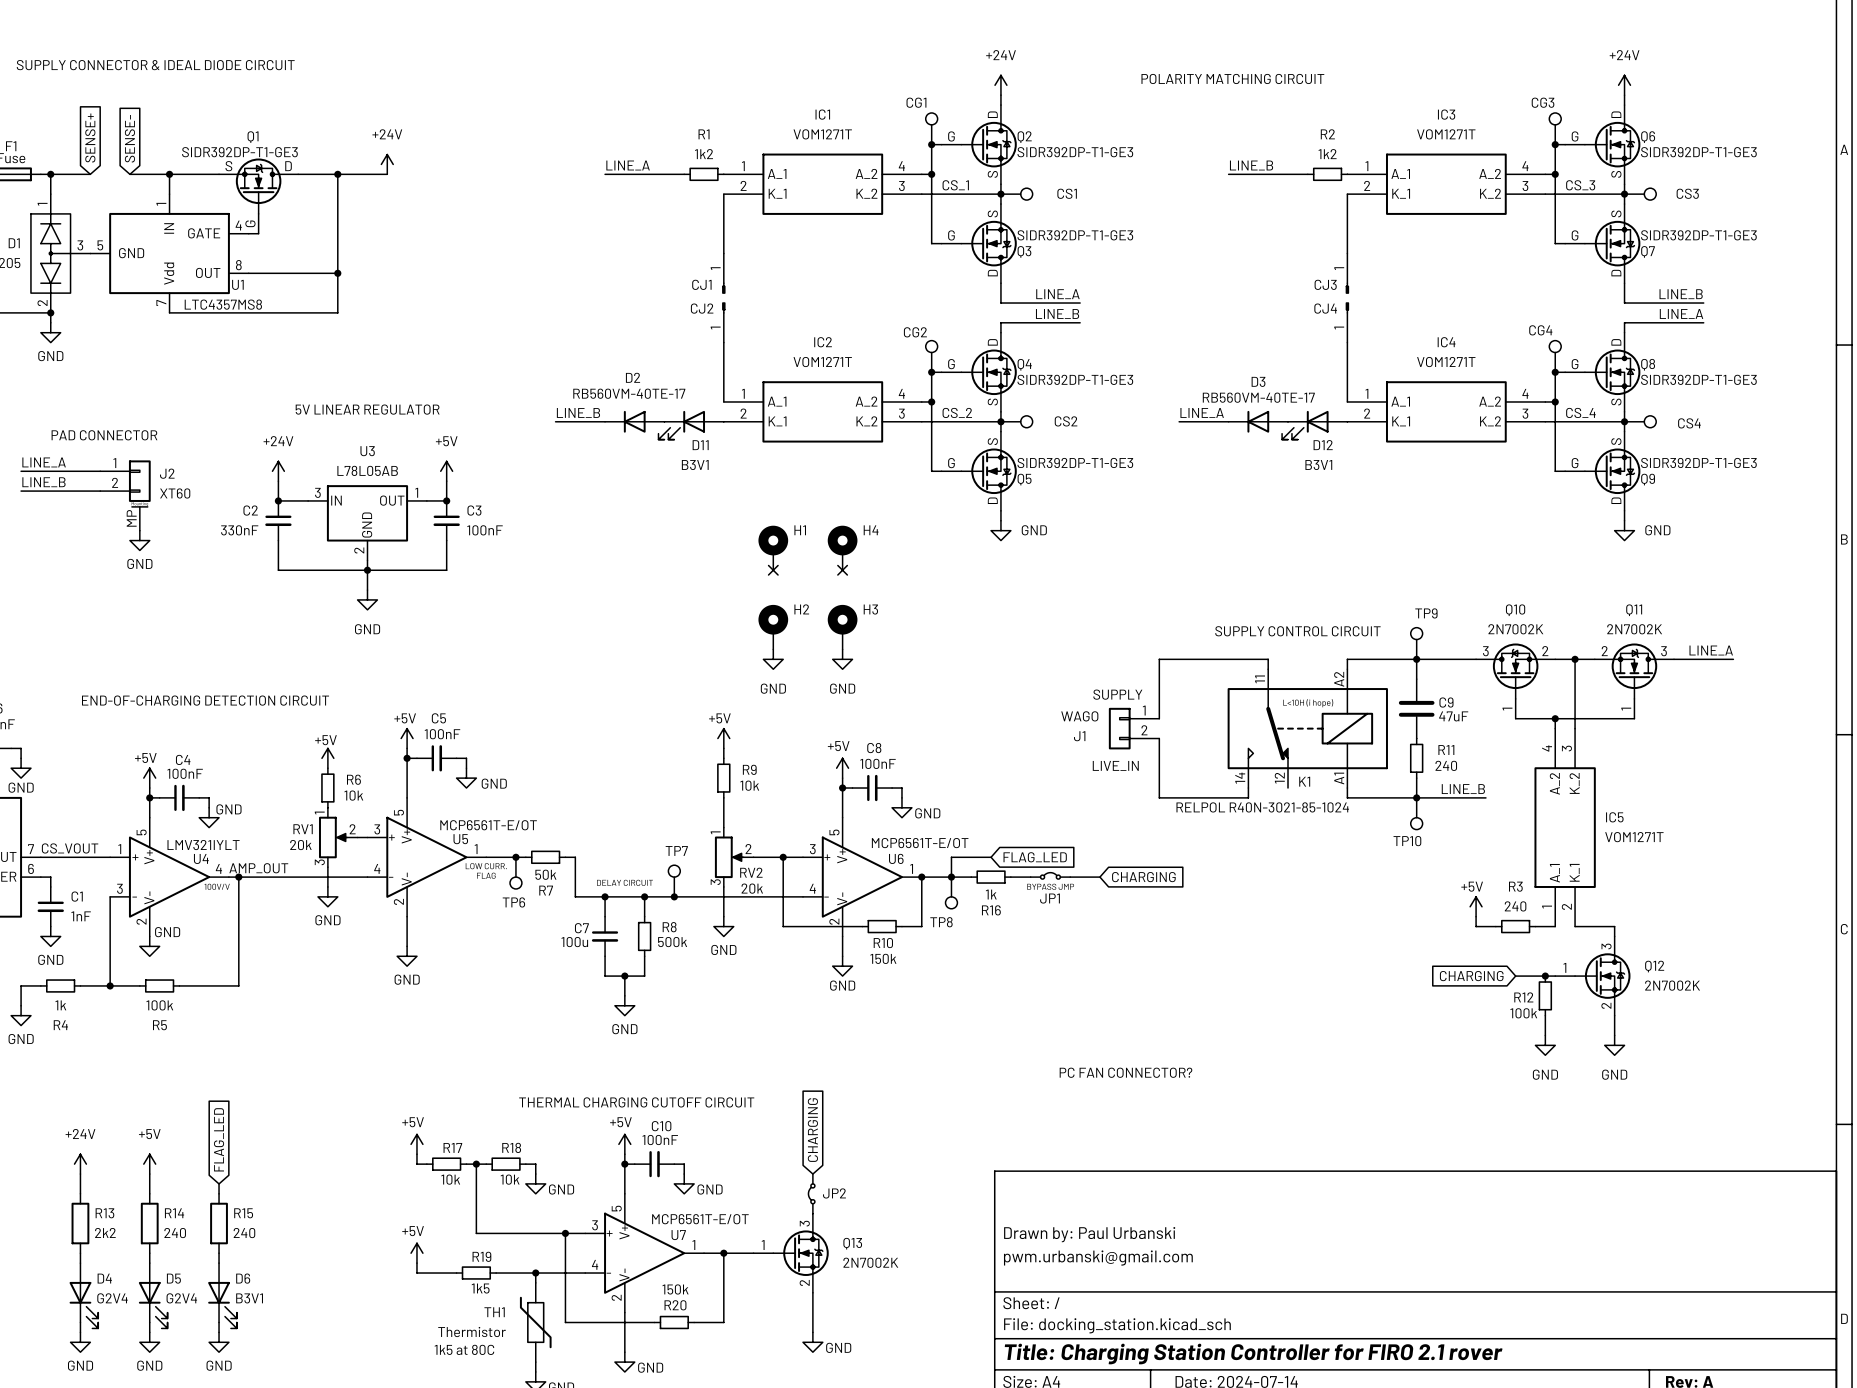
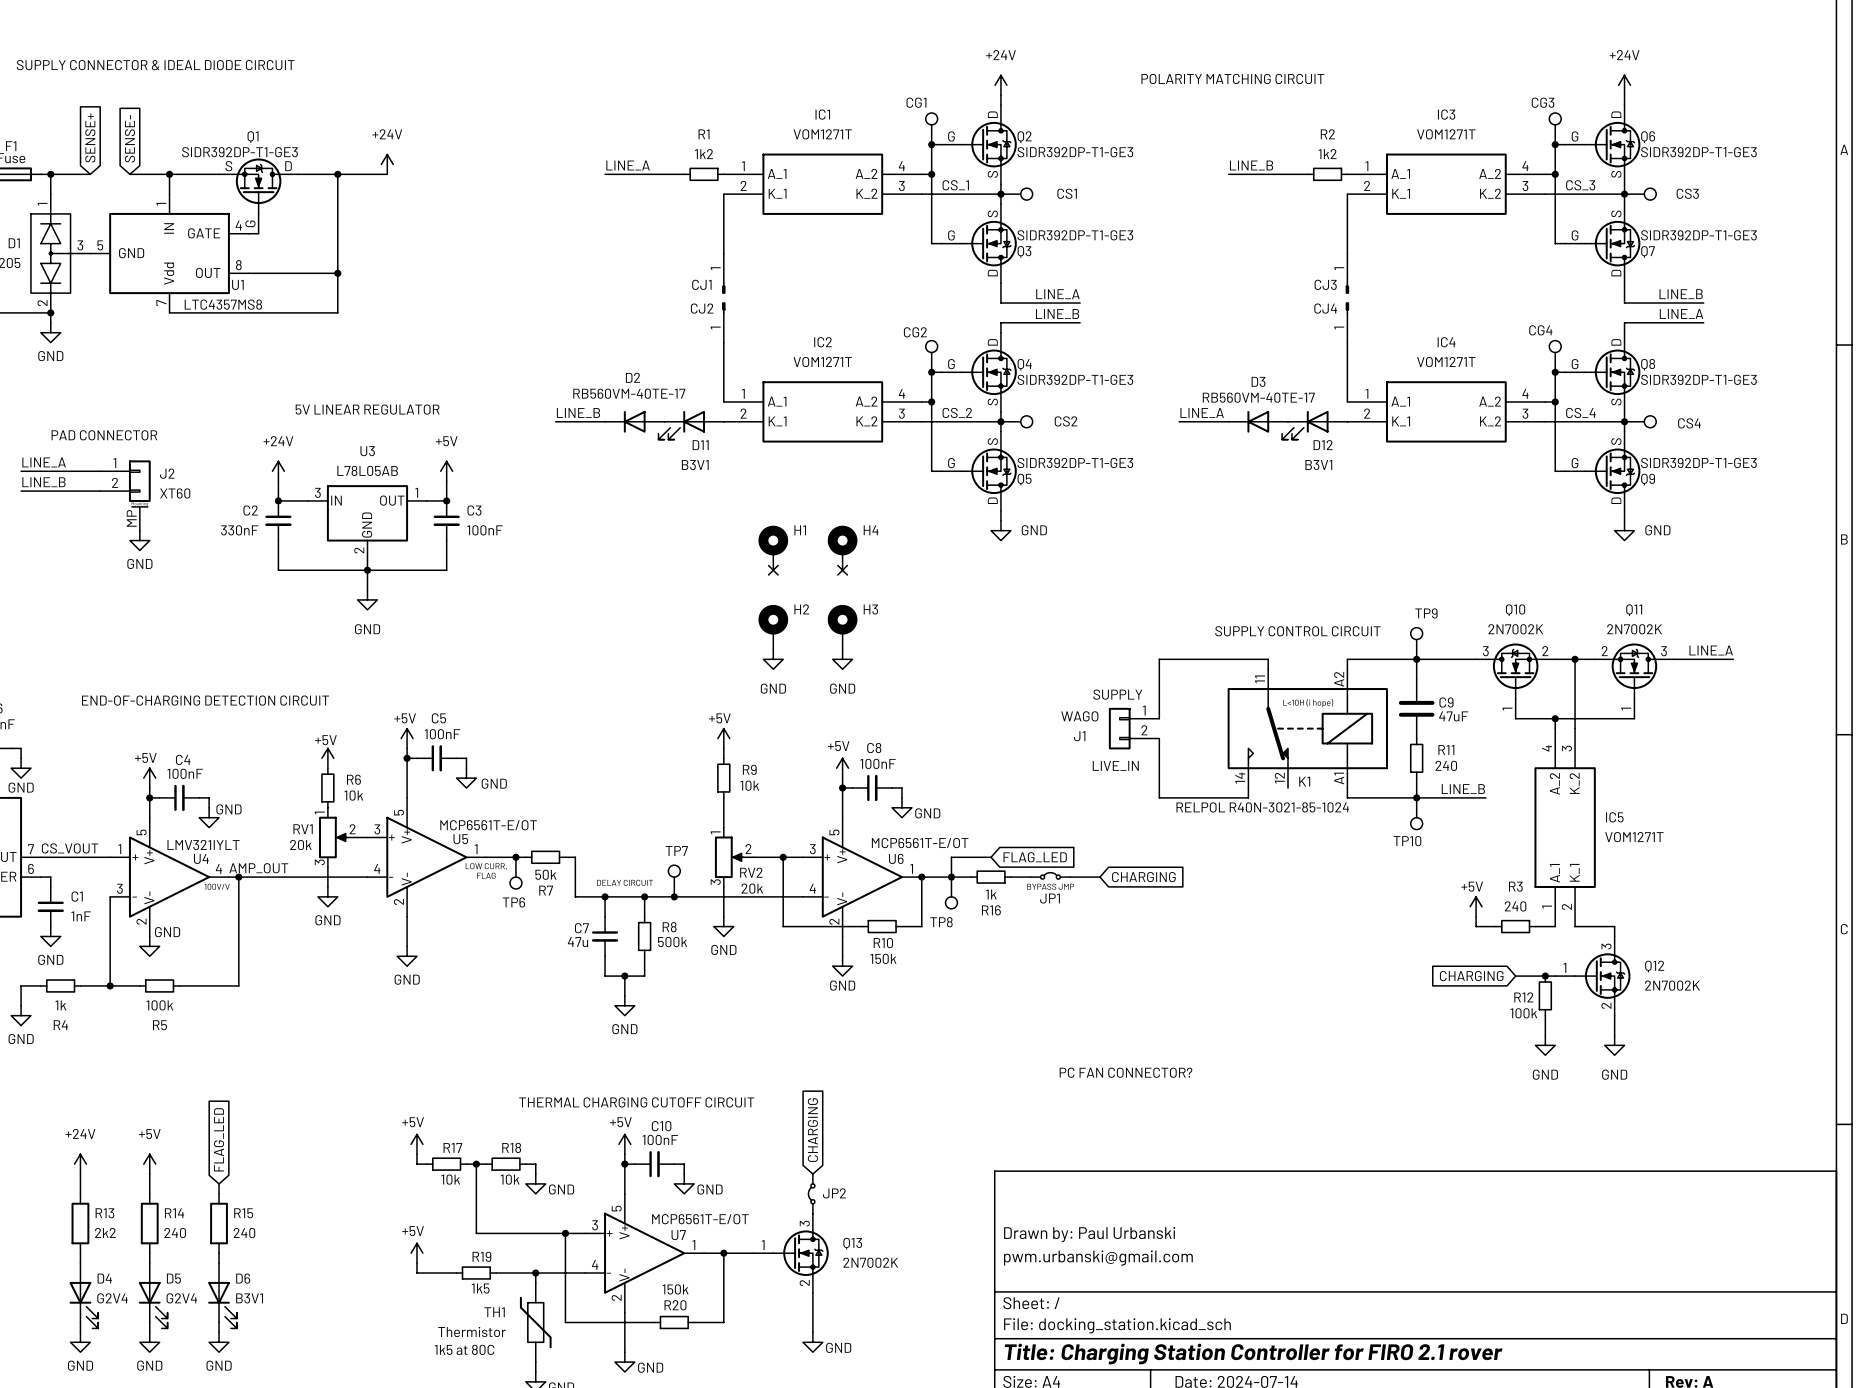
C7 value: 100u (574, 942) -> 47u (577, 942)

